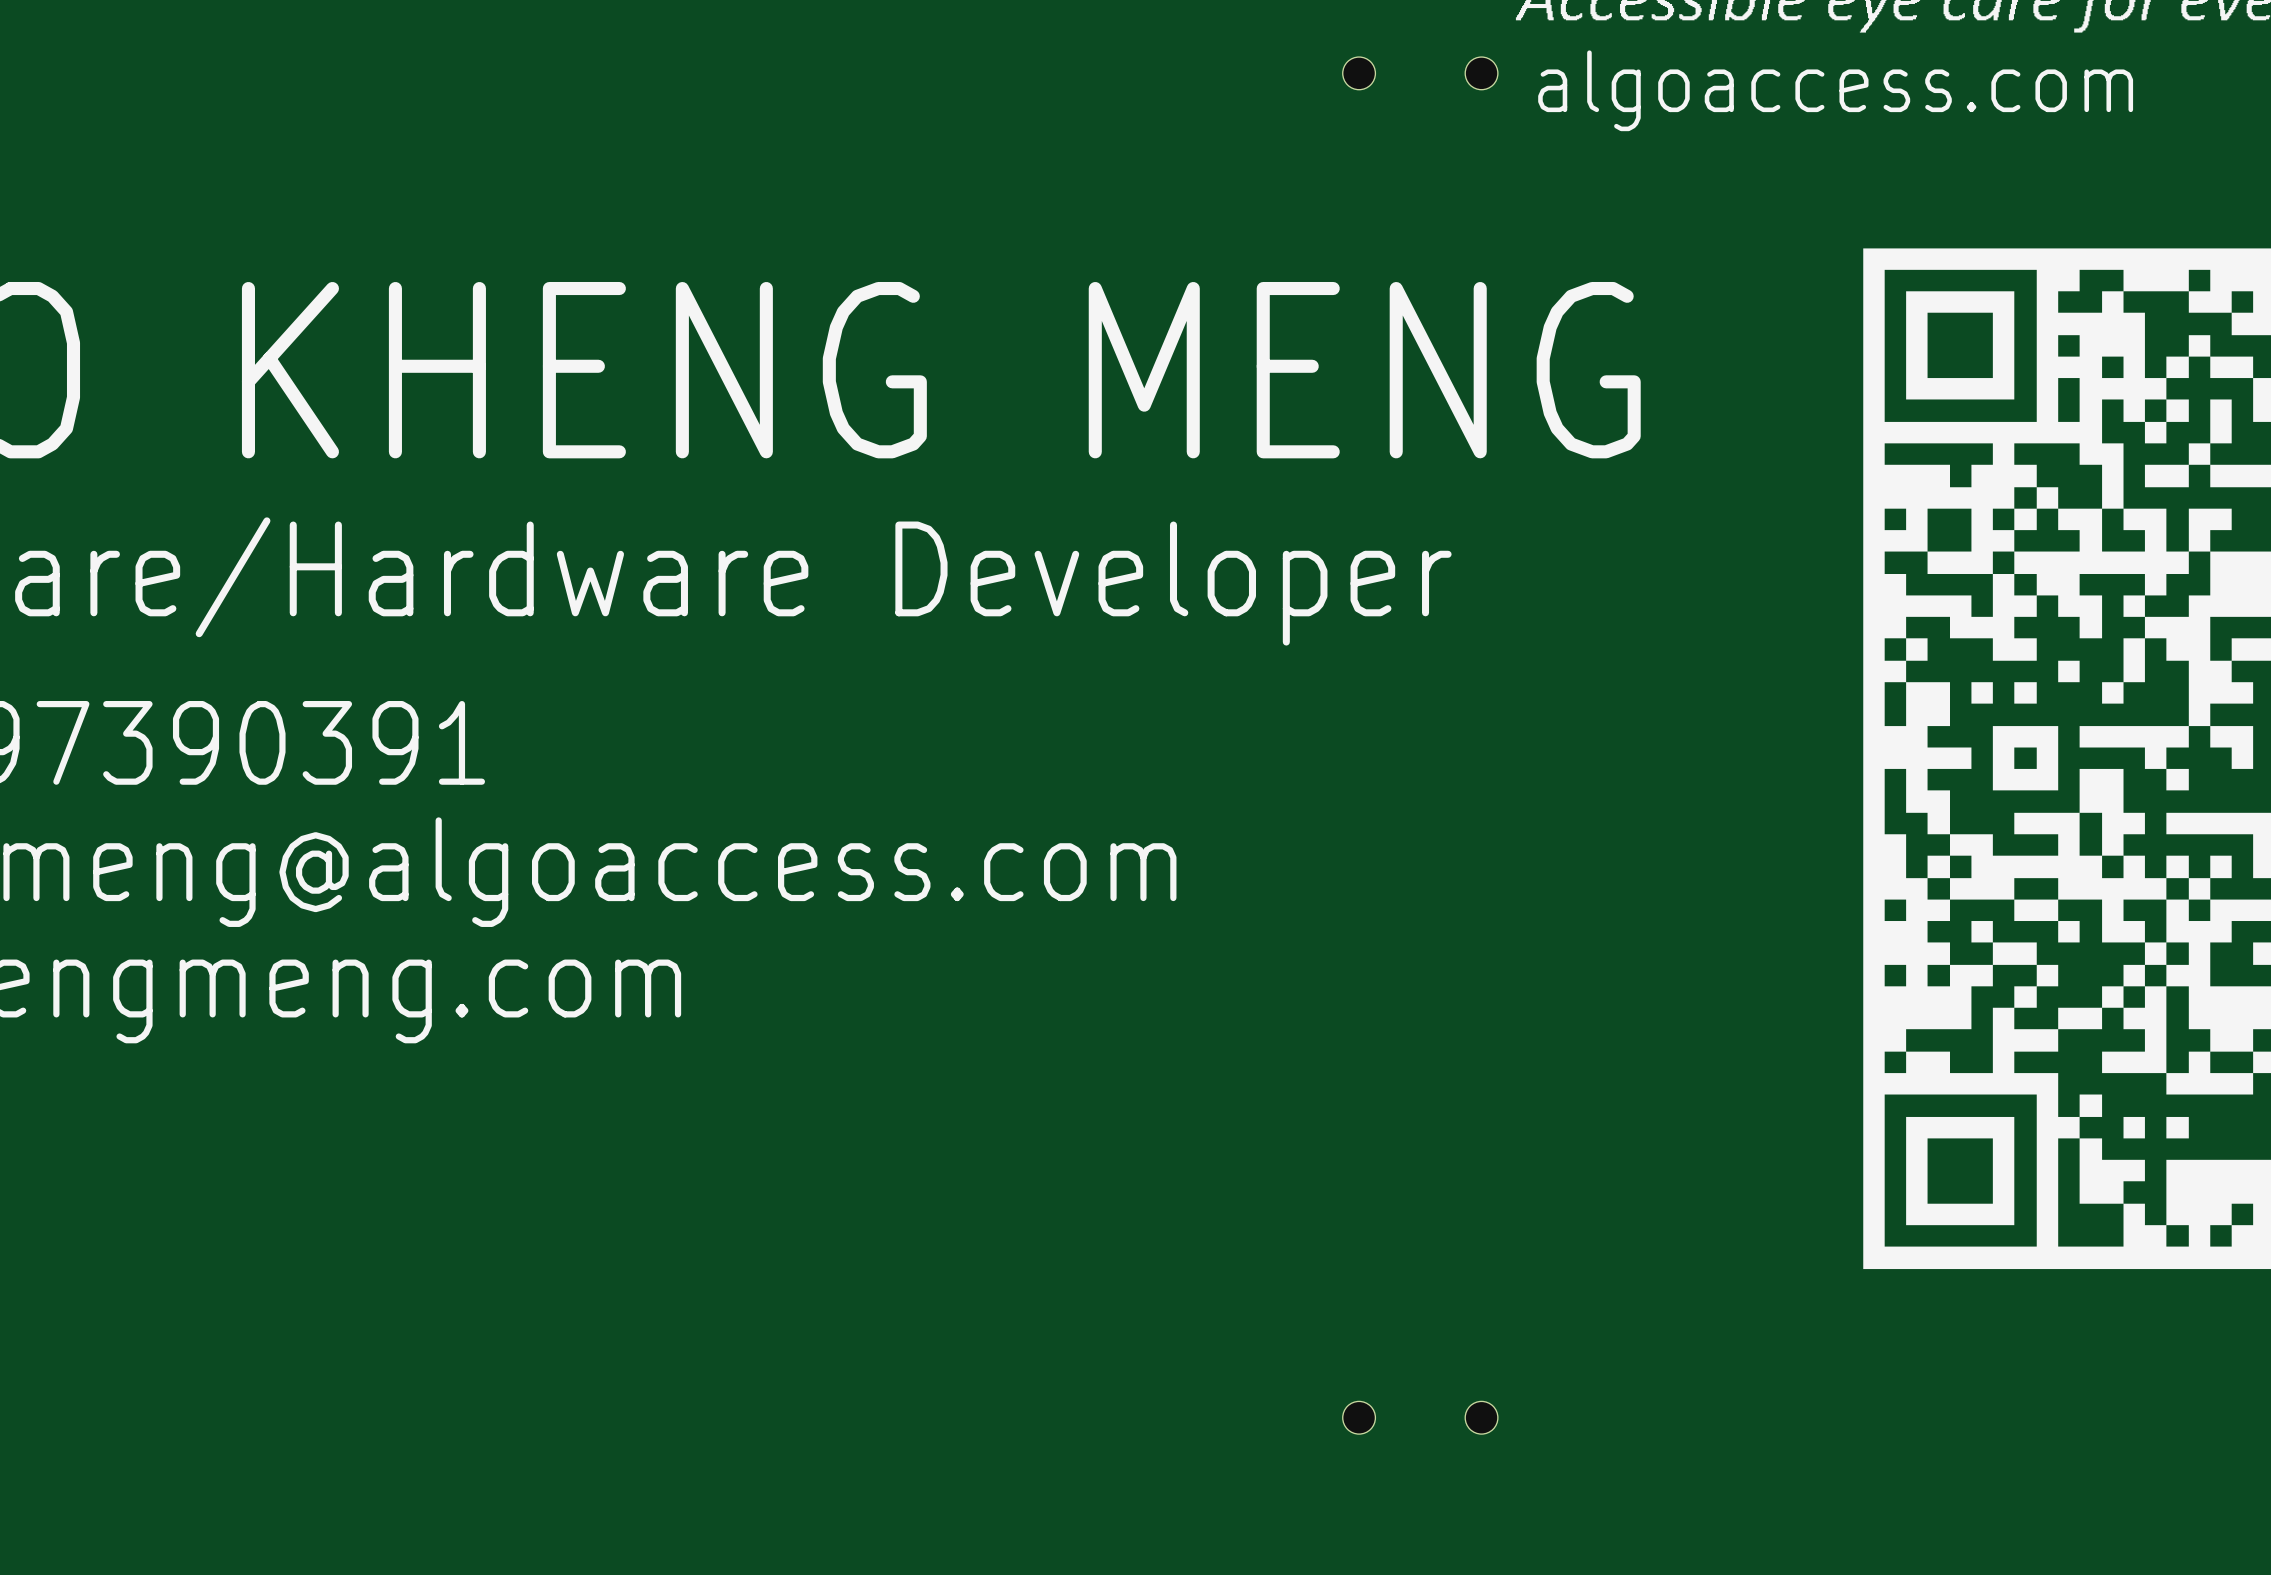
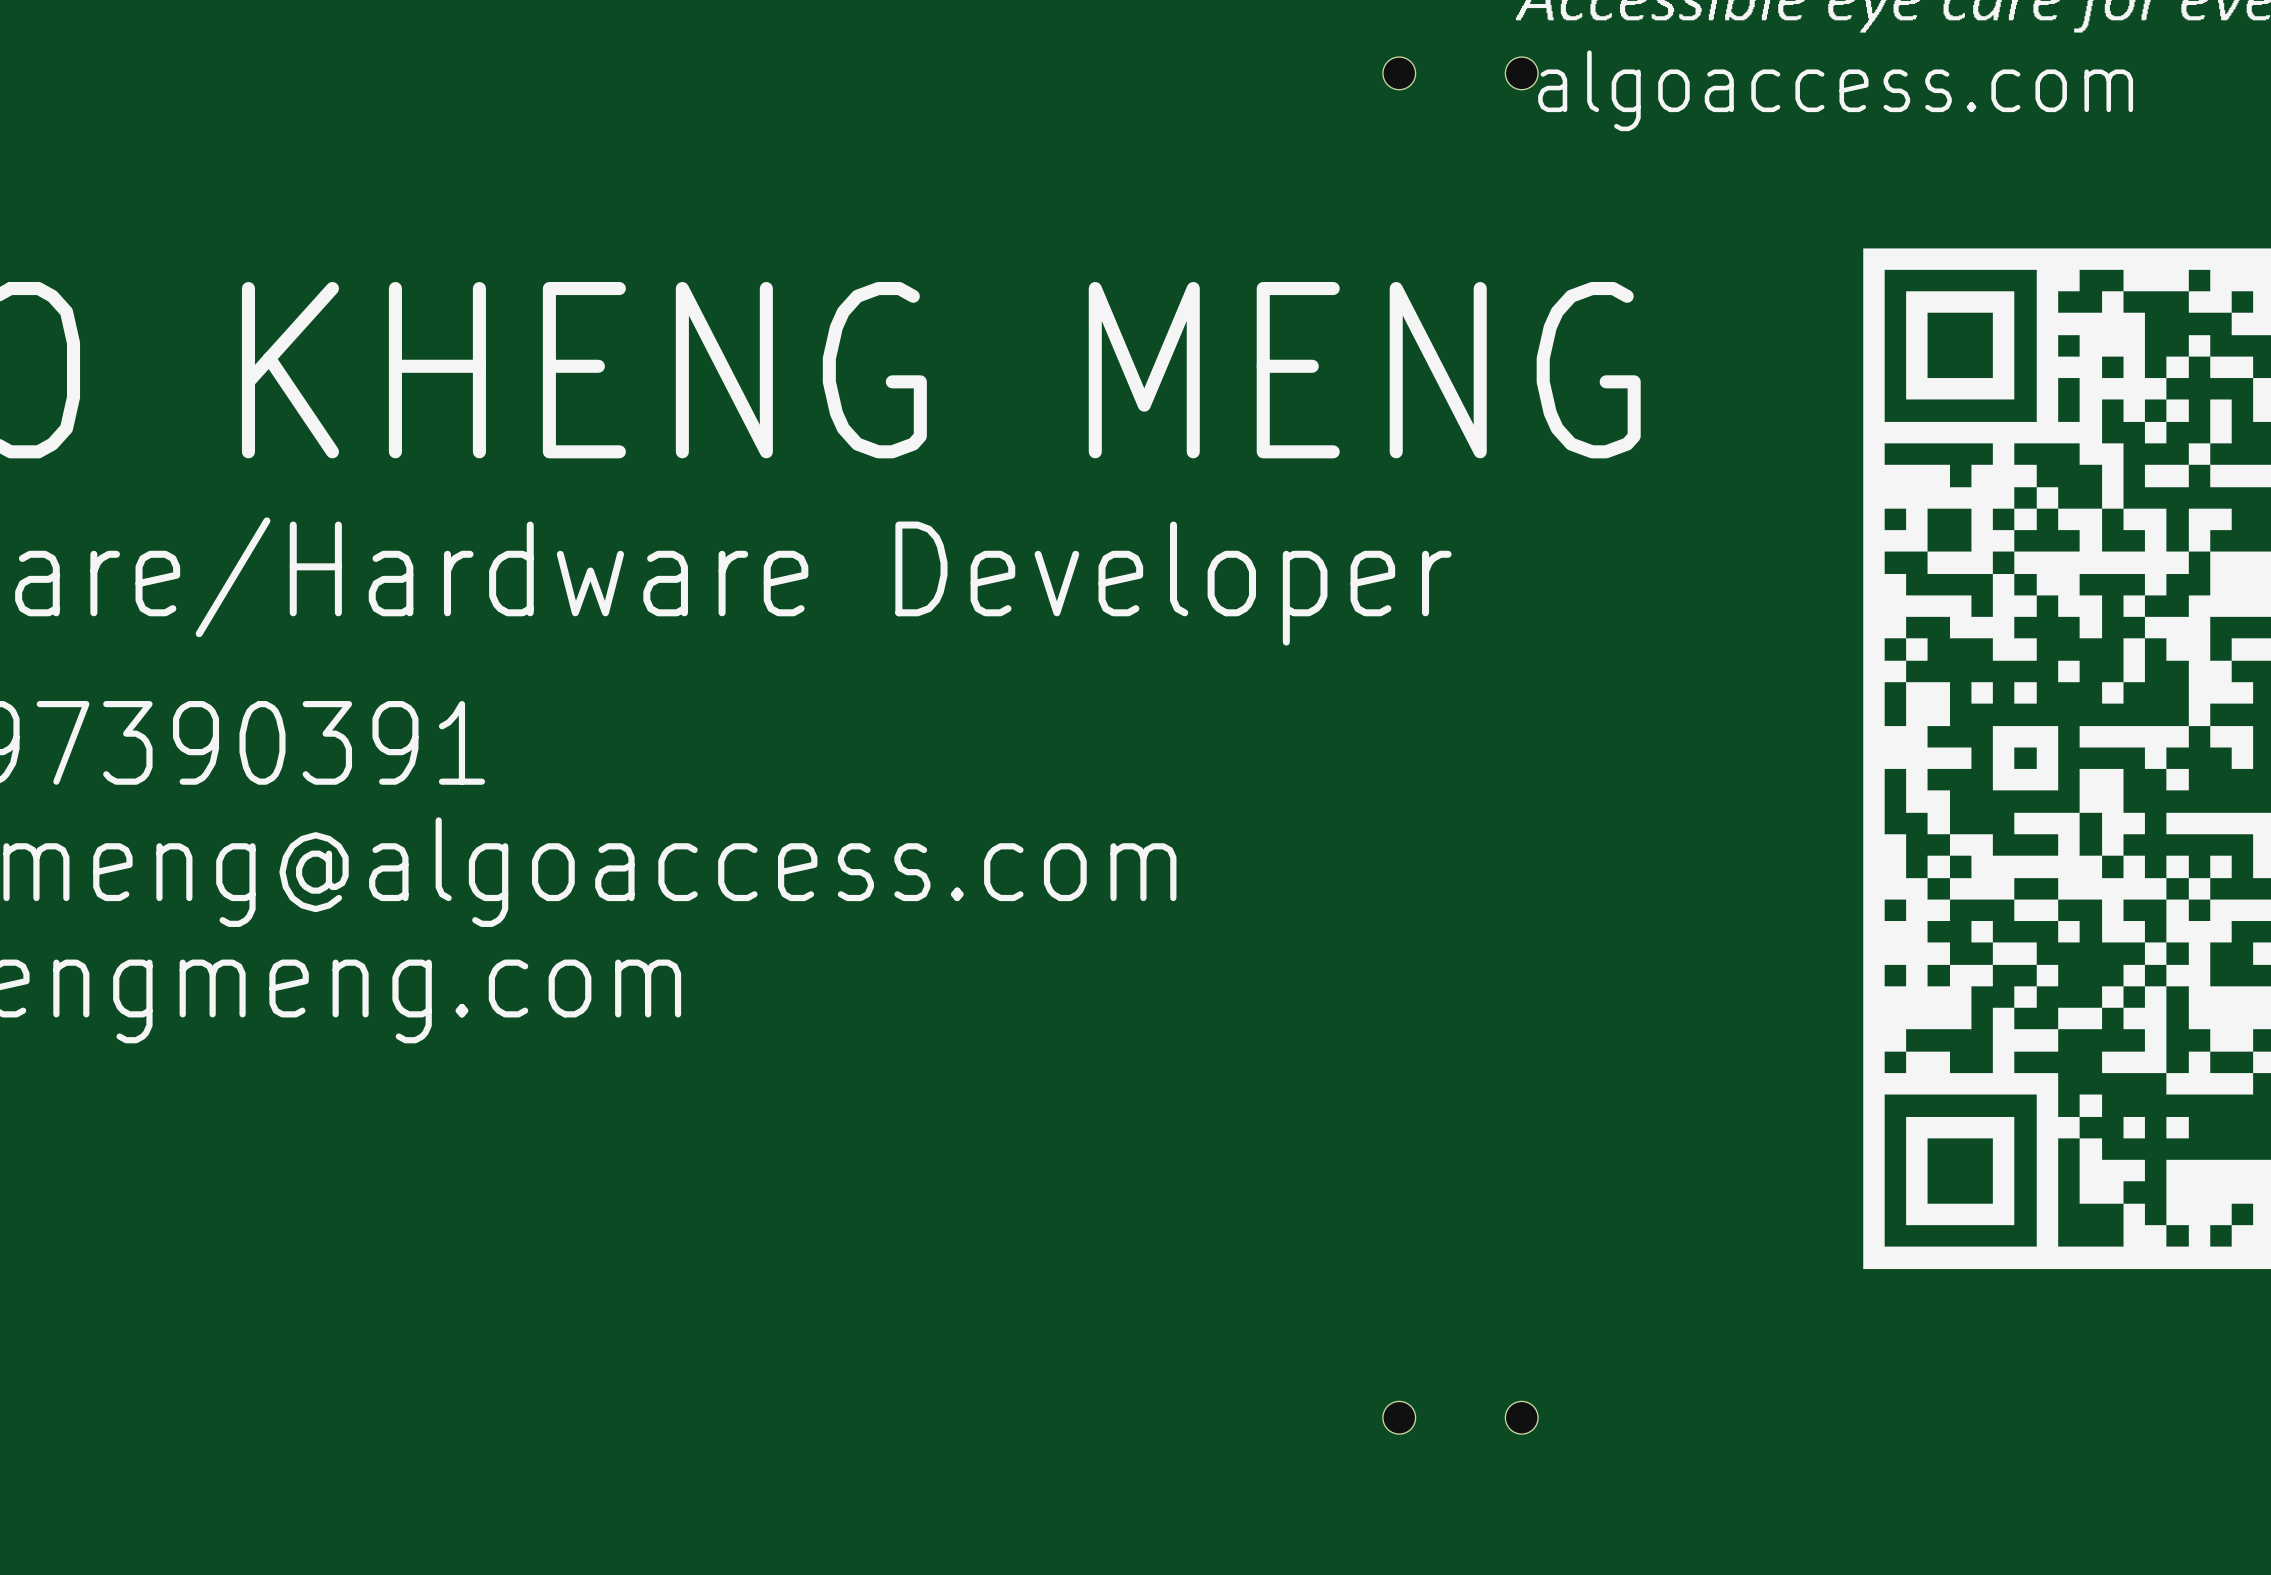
part position: (1420, 73) -> (1460, 73)
part position: (1420, 1417) -> (1460, 1417)

